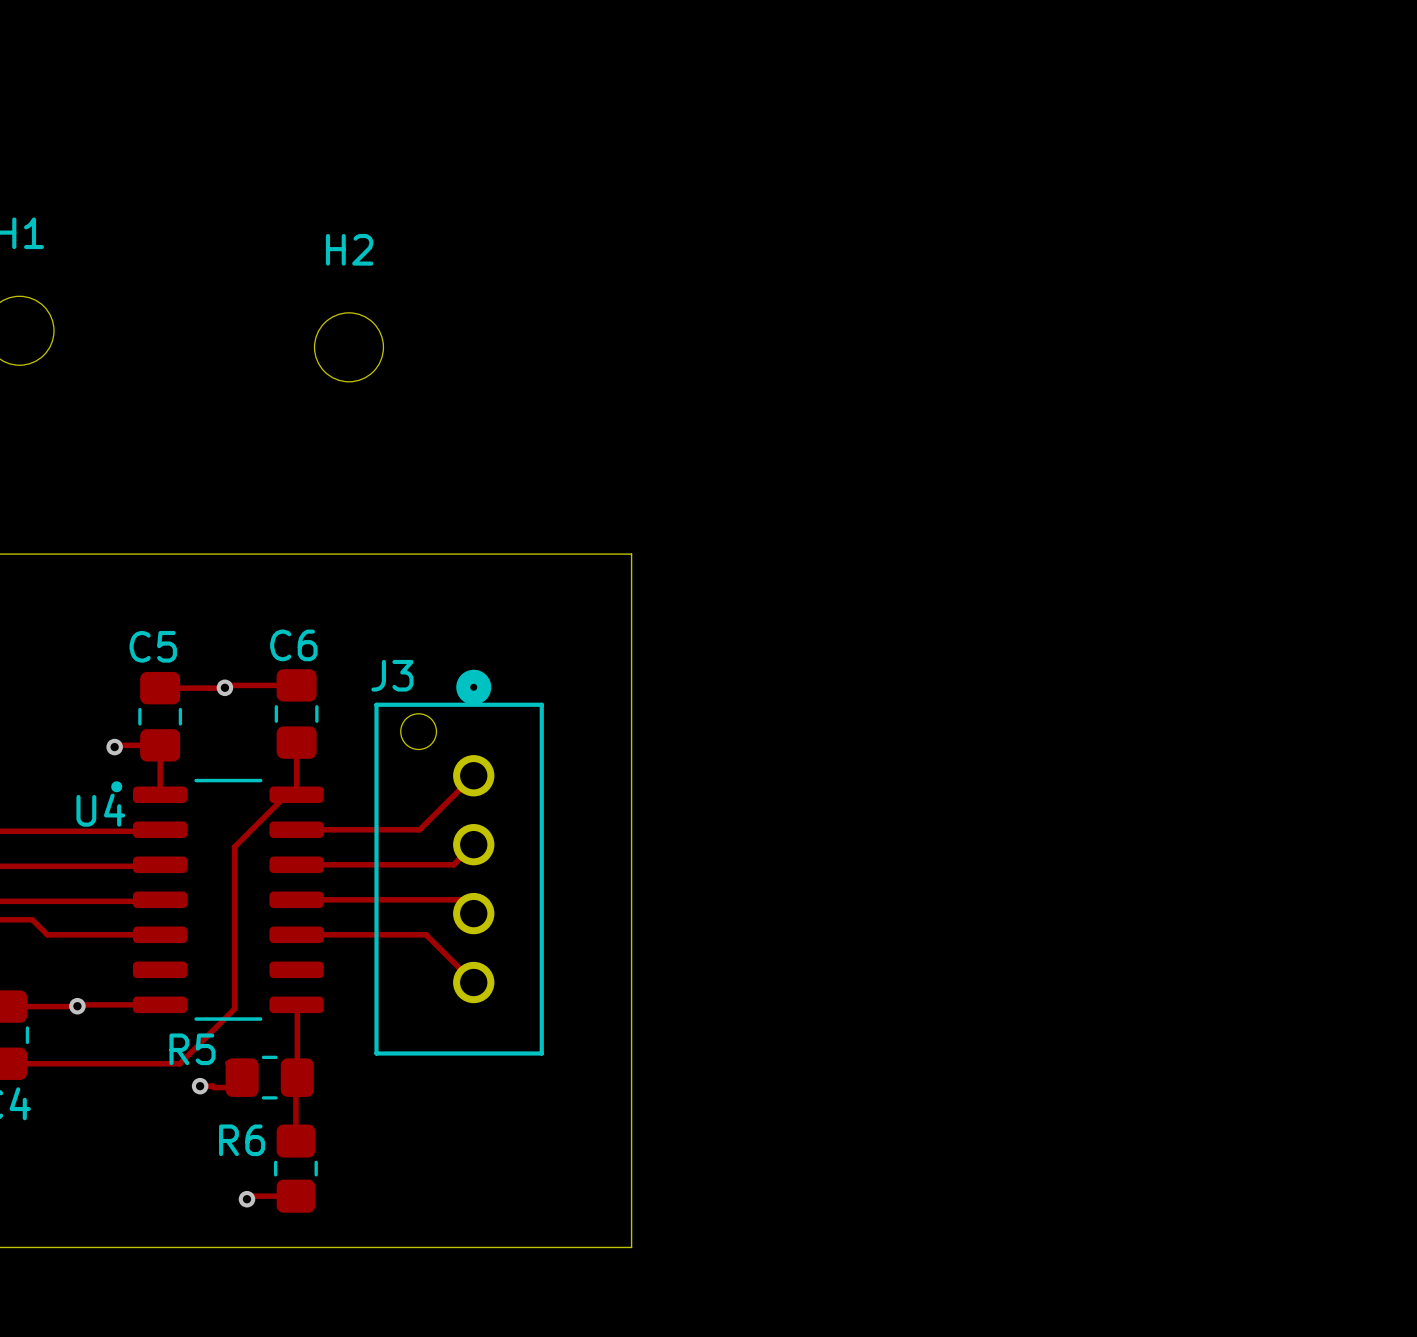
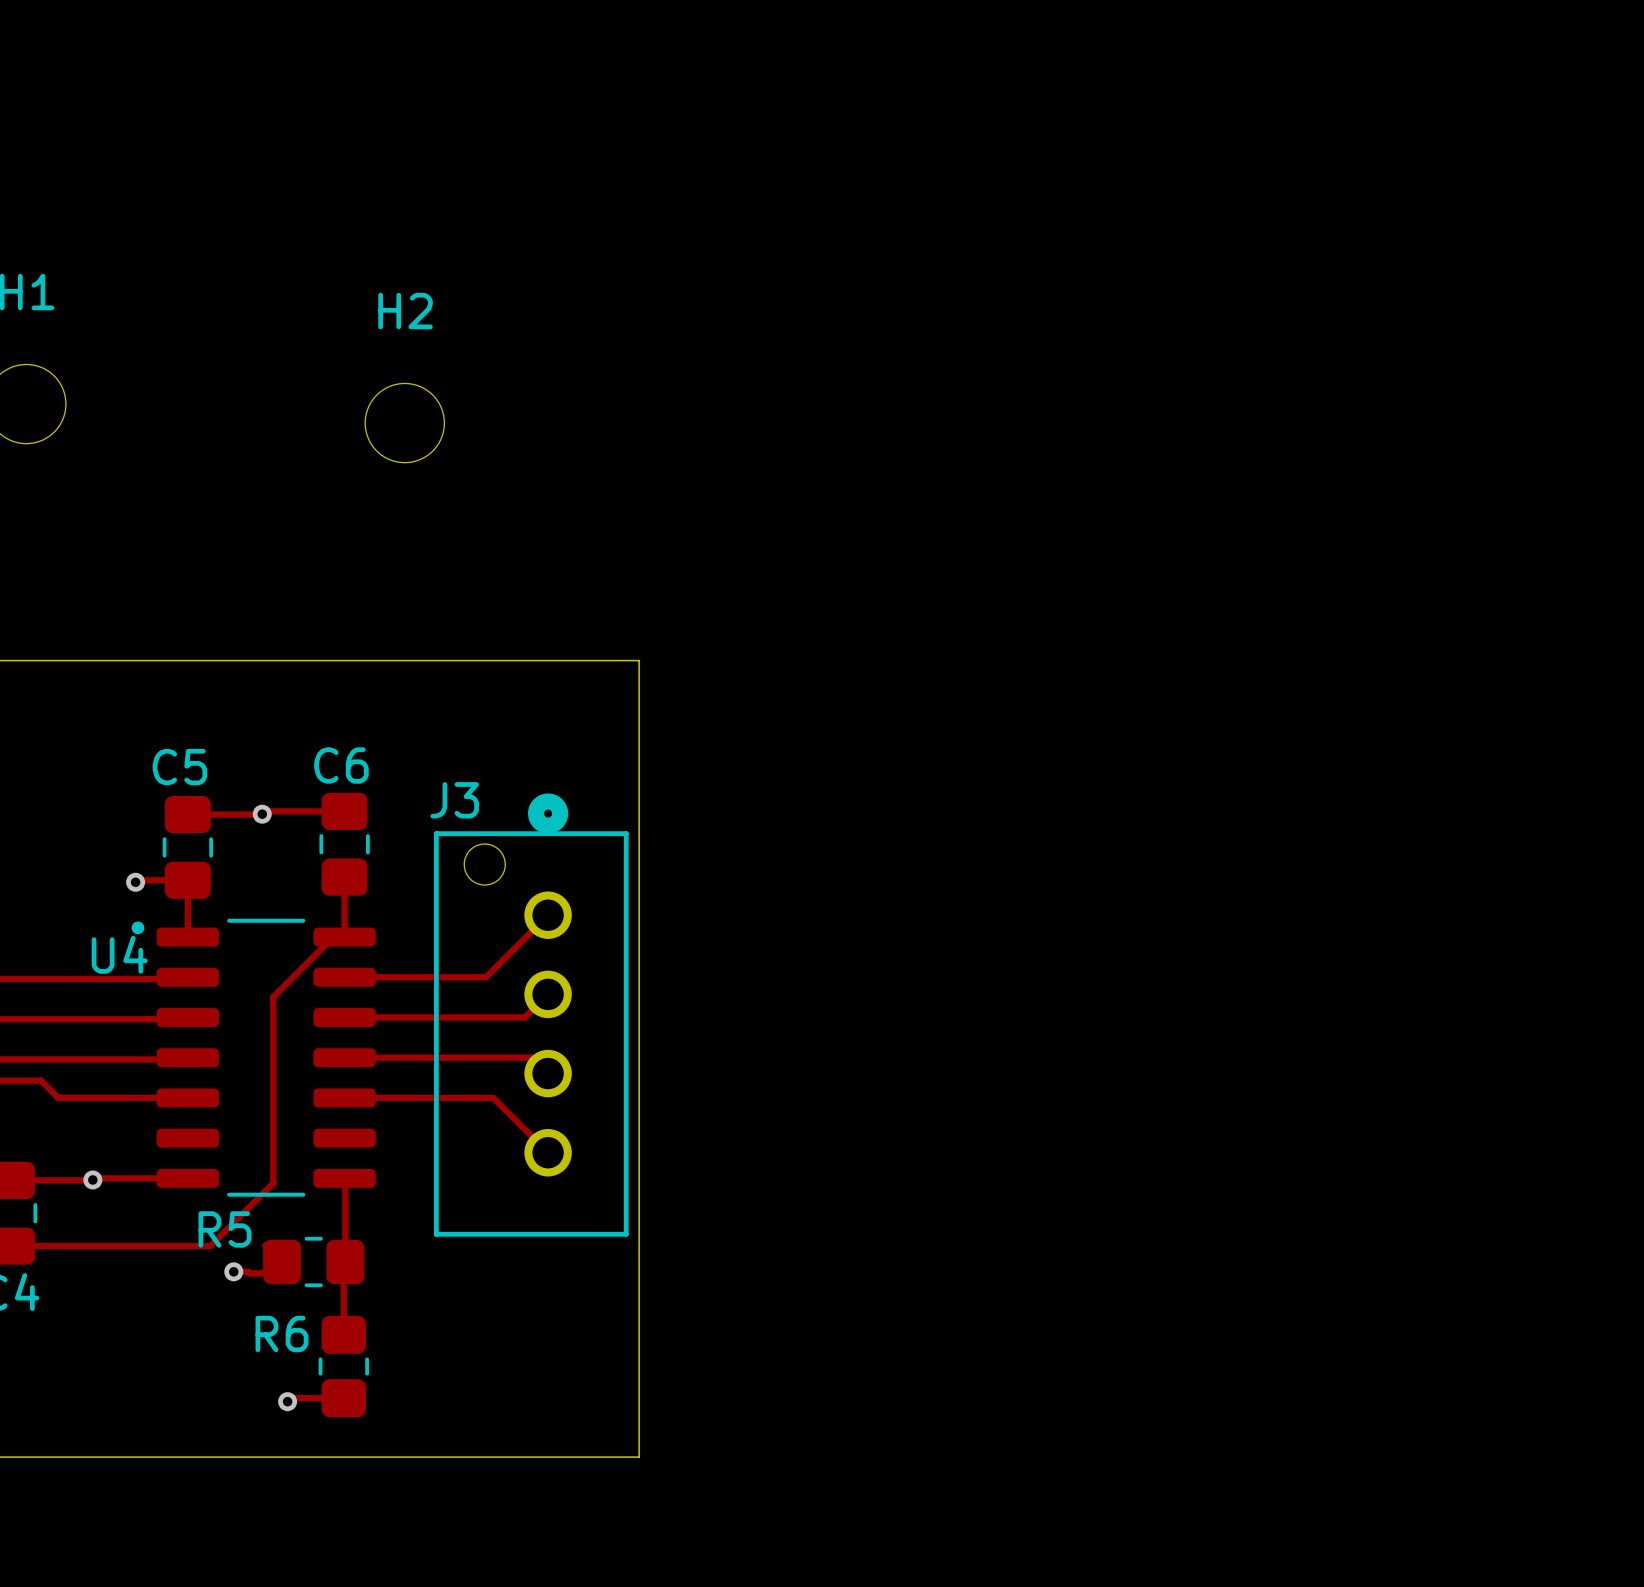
board edge: (553, 554) (631, 554) (631, 1247) (553, 1247) -> (639, 660) (639, 1457)

